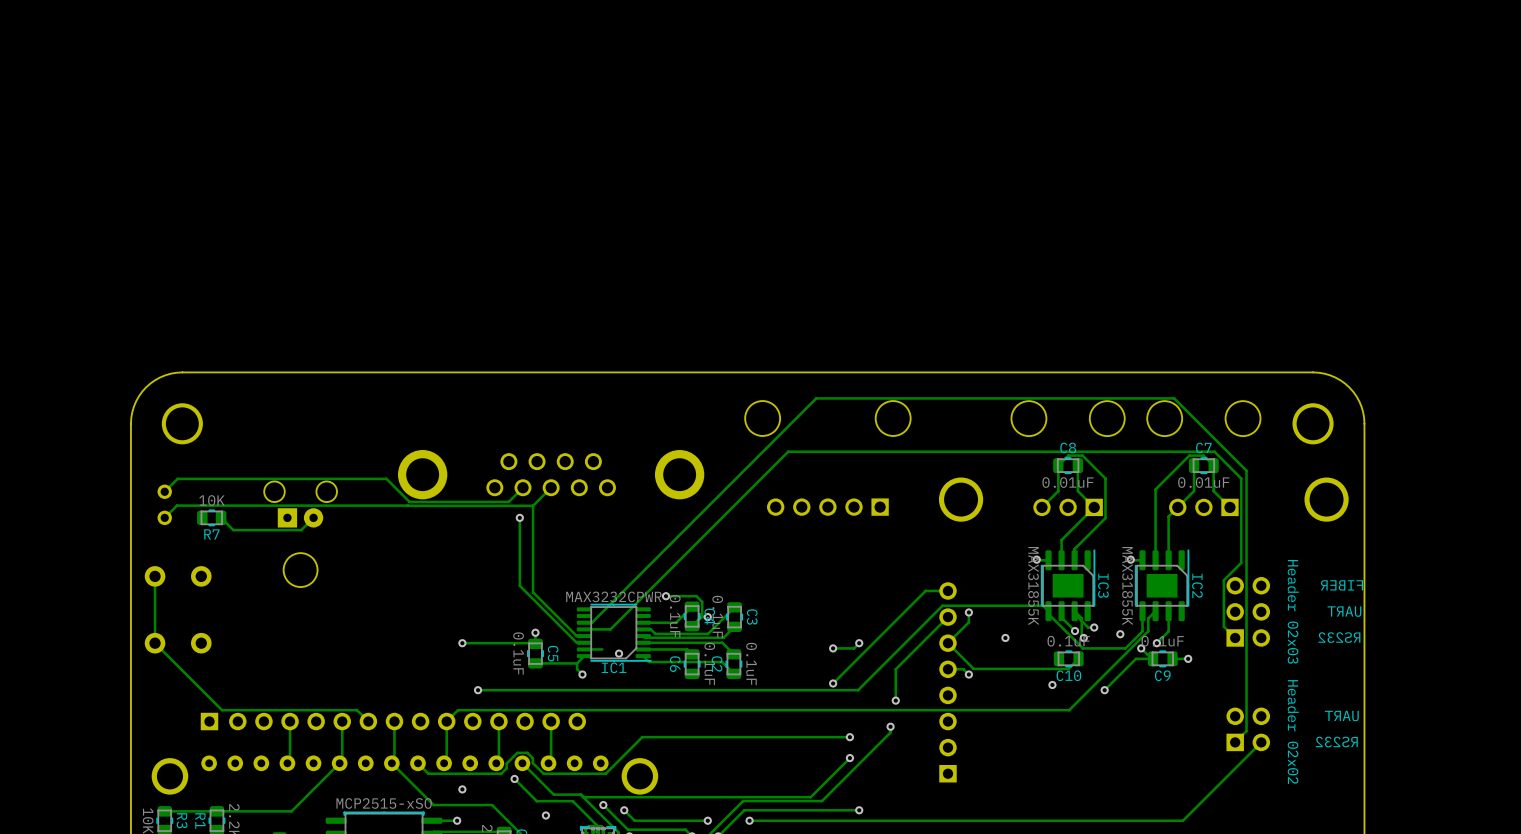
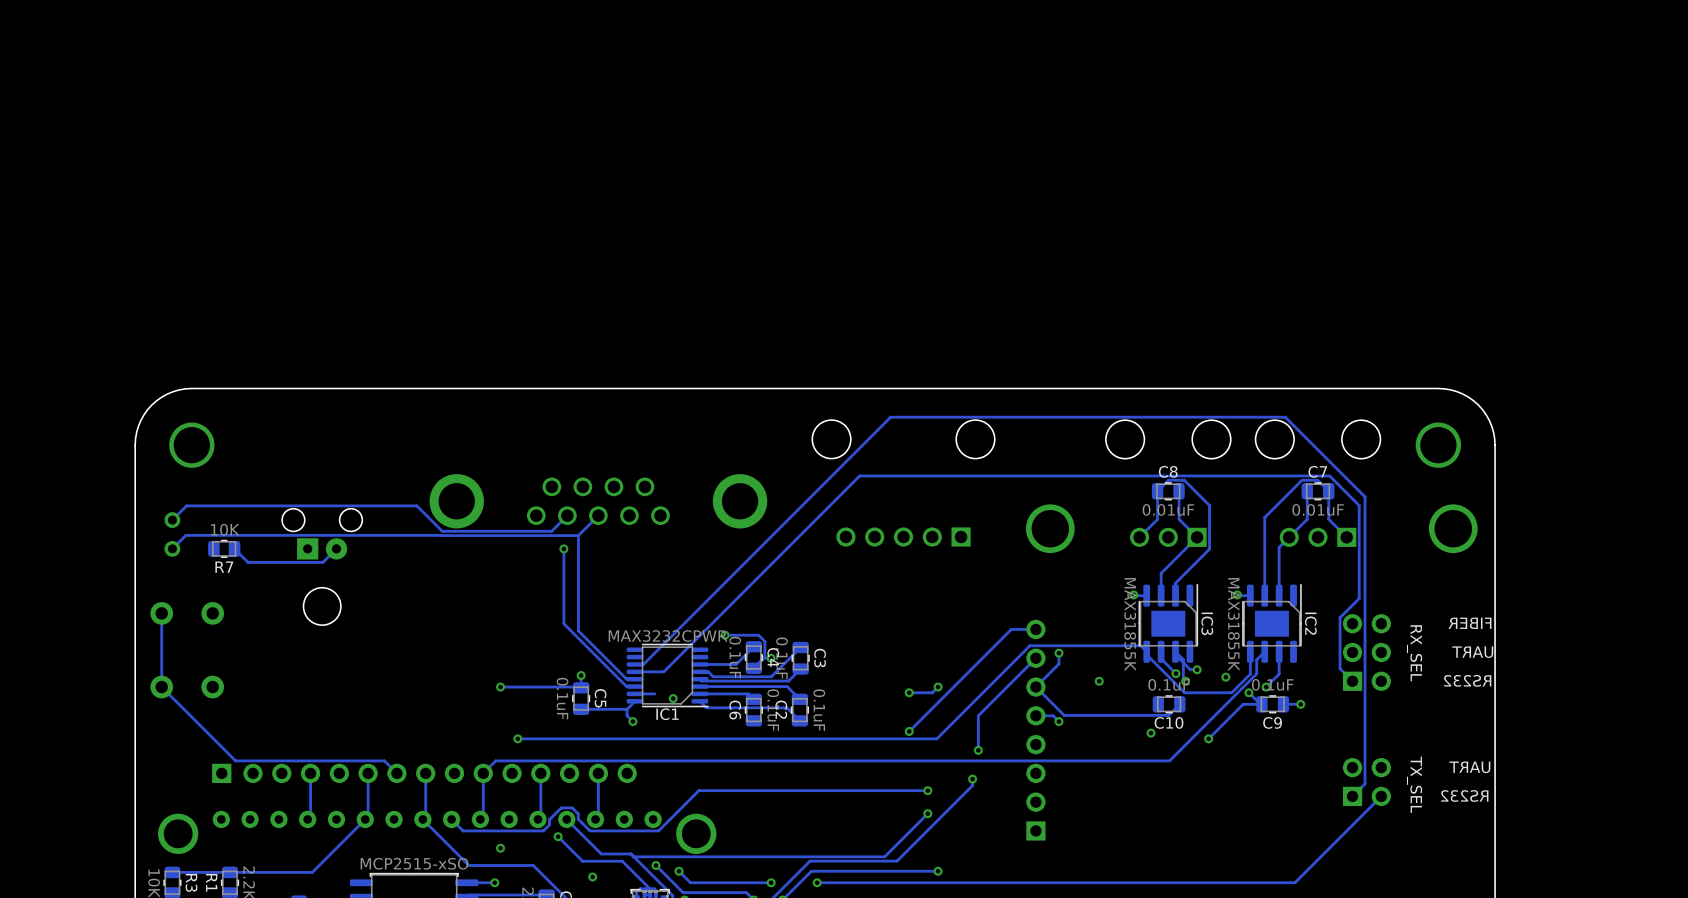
part value: Header 02x03 (1293, 611) -> RX_SEL (1414, 653)
part value: Header 02x02 (1293, 732) -> TX_SEL (1414, 784)

